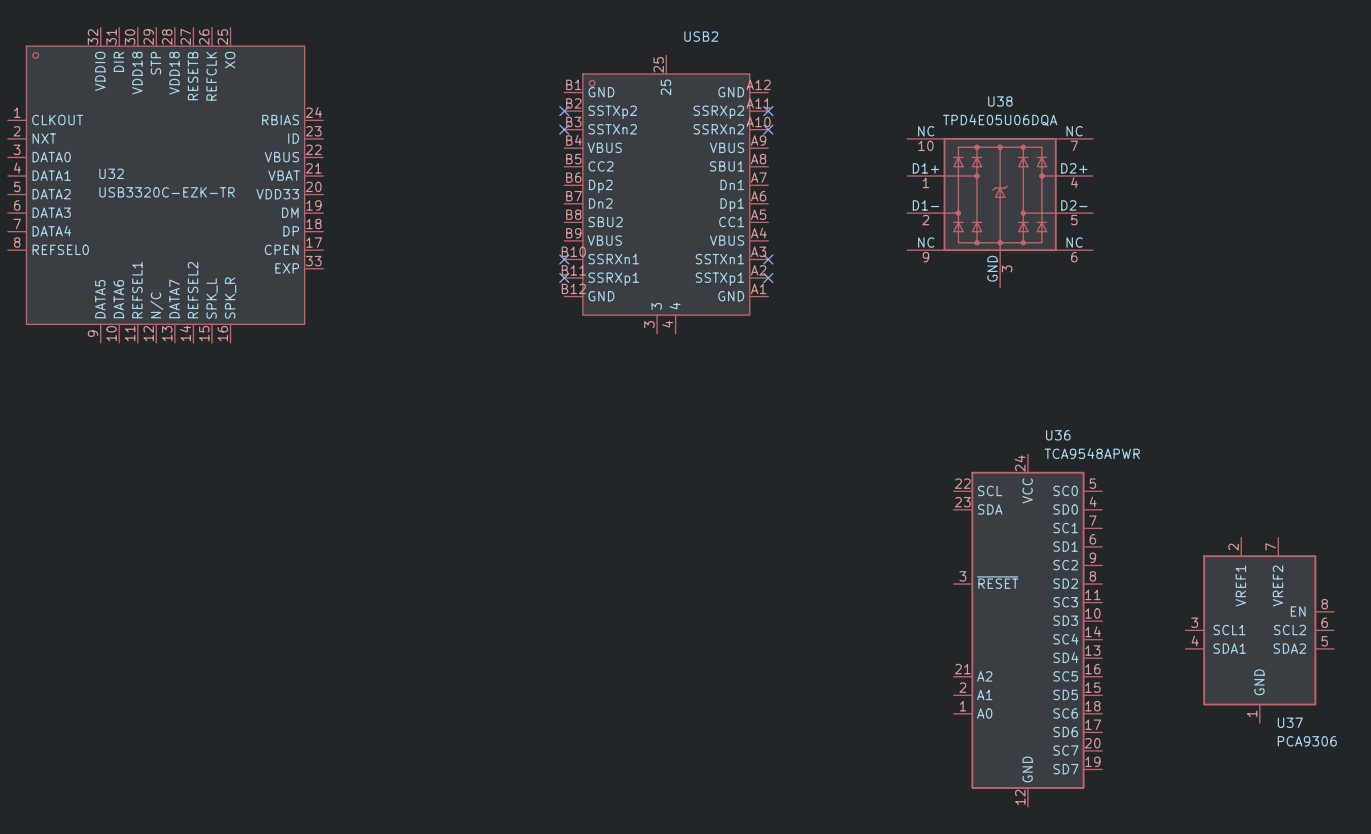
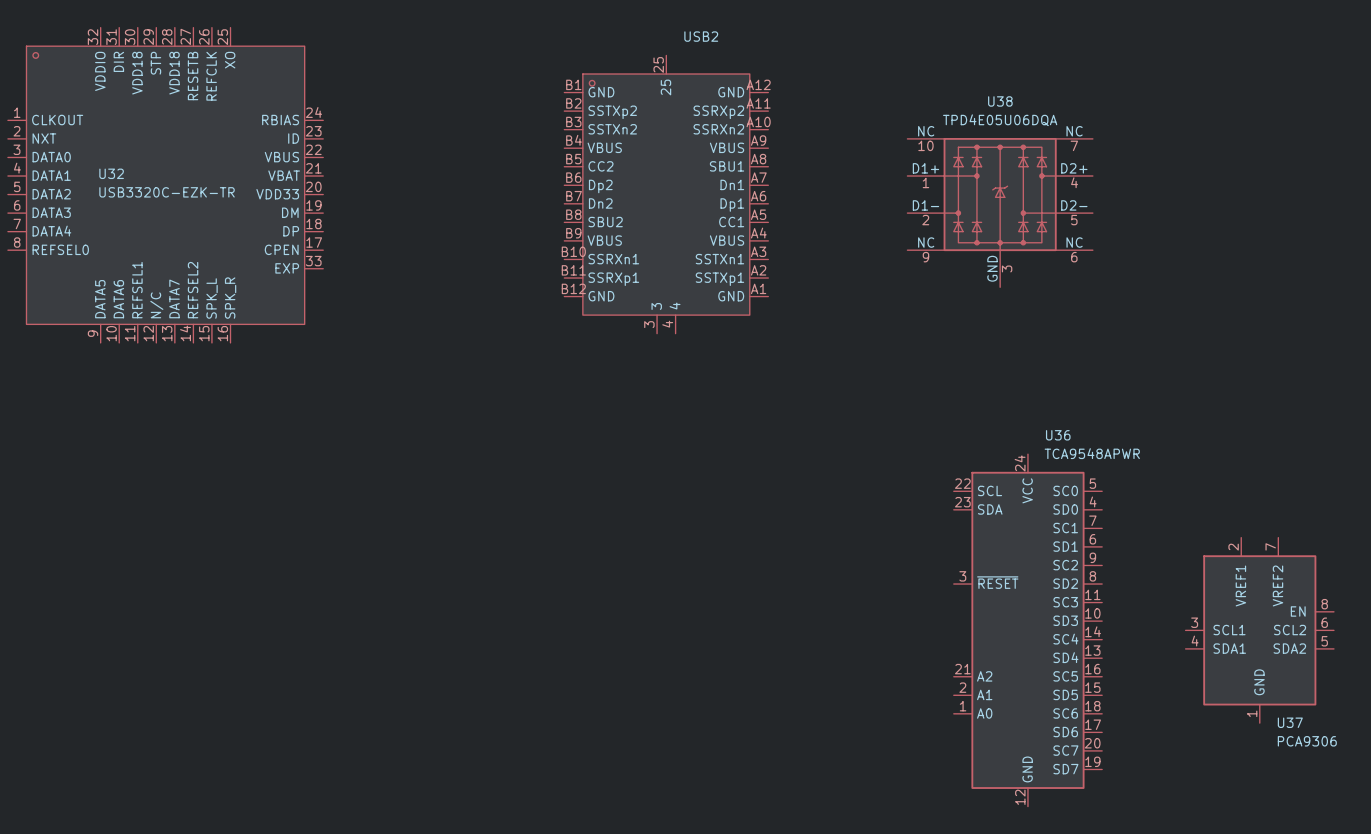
no-connect mark: (564, 111) -> none
no-connect mark: (768, 111) -> none
no-connect mark: (564, 129) -> none
no-connect mark: (768, 129) -> none
no-connect mark: (564, 259) -> none
no-connect mark: (768, 259) -> none
no-connect mark: (564, 278) -> none
no-connect mark: (768, 278) -> none

